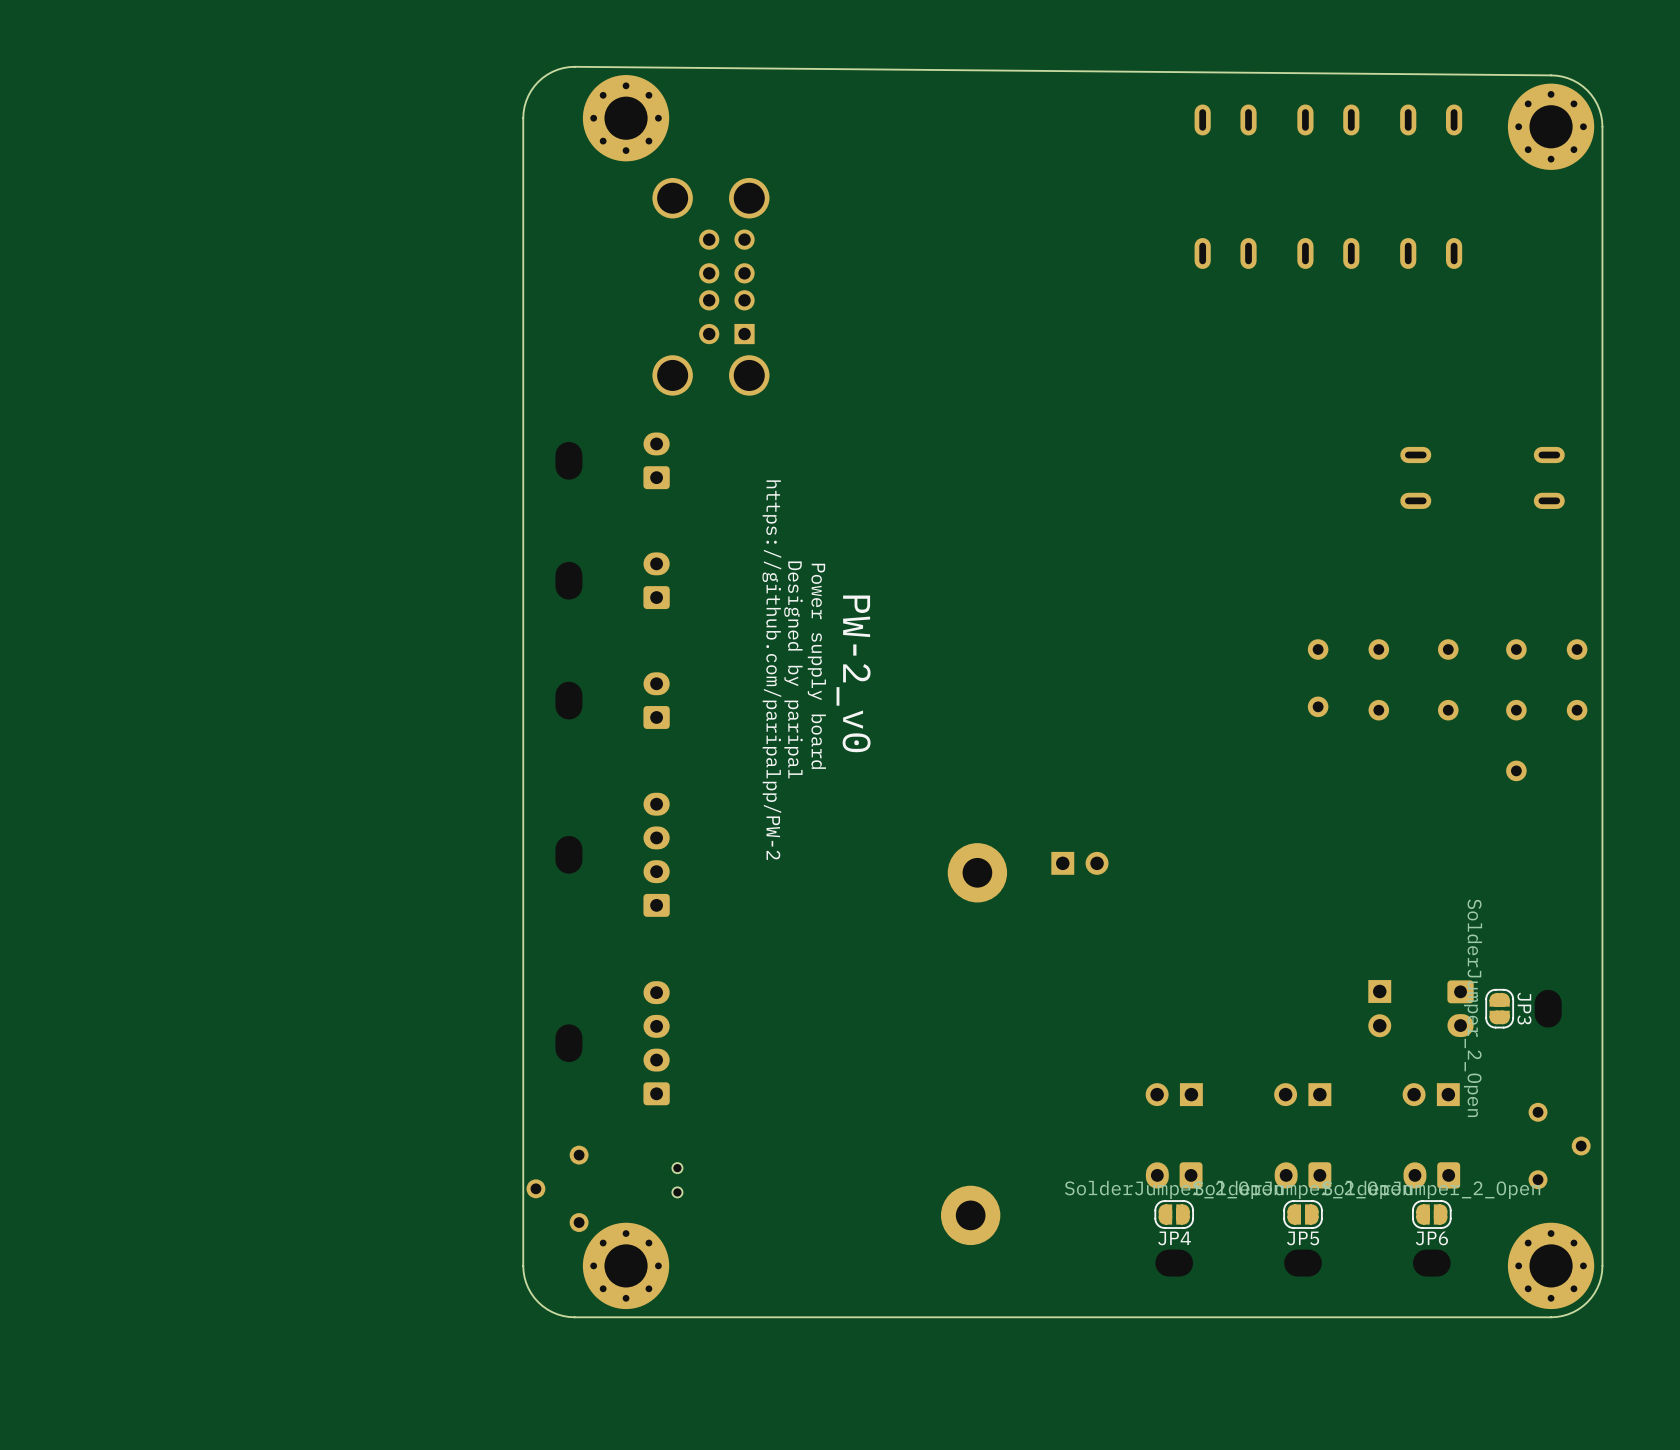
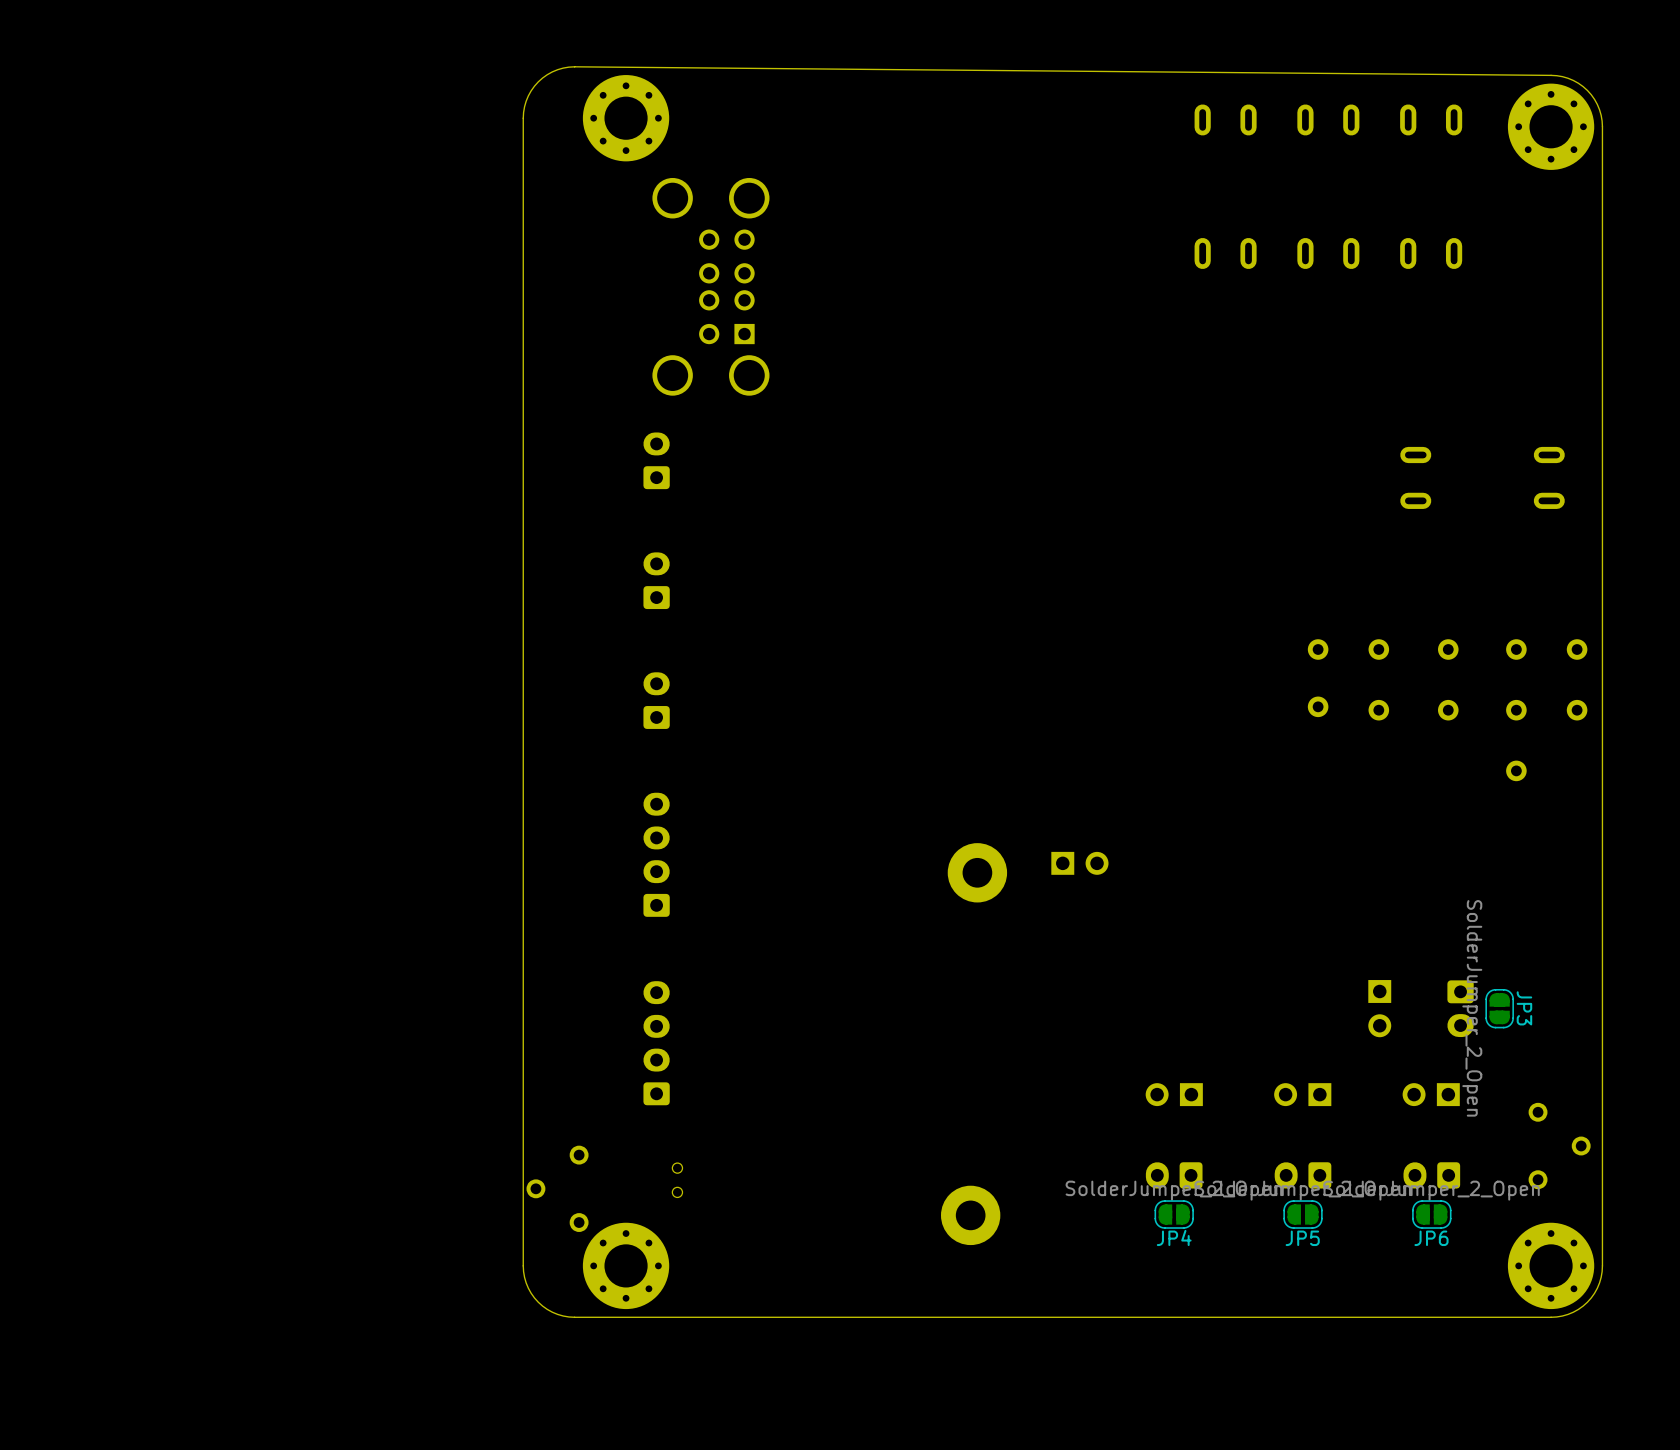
text: Power supply board (816, 666) -> none
text: Designed by paripal (793, 669) -> none
text: https://github.com/paripalpp/PW-2 (771, 670) -> none
text: PW-2_v0 (853, 673) -> none

